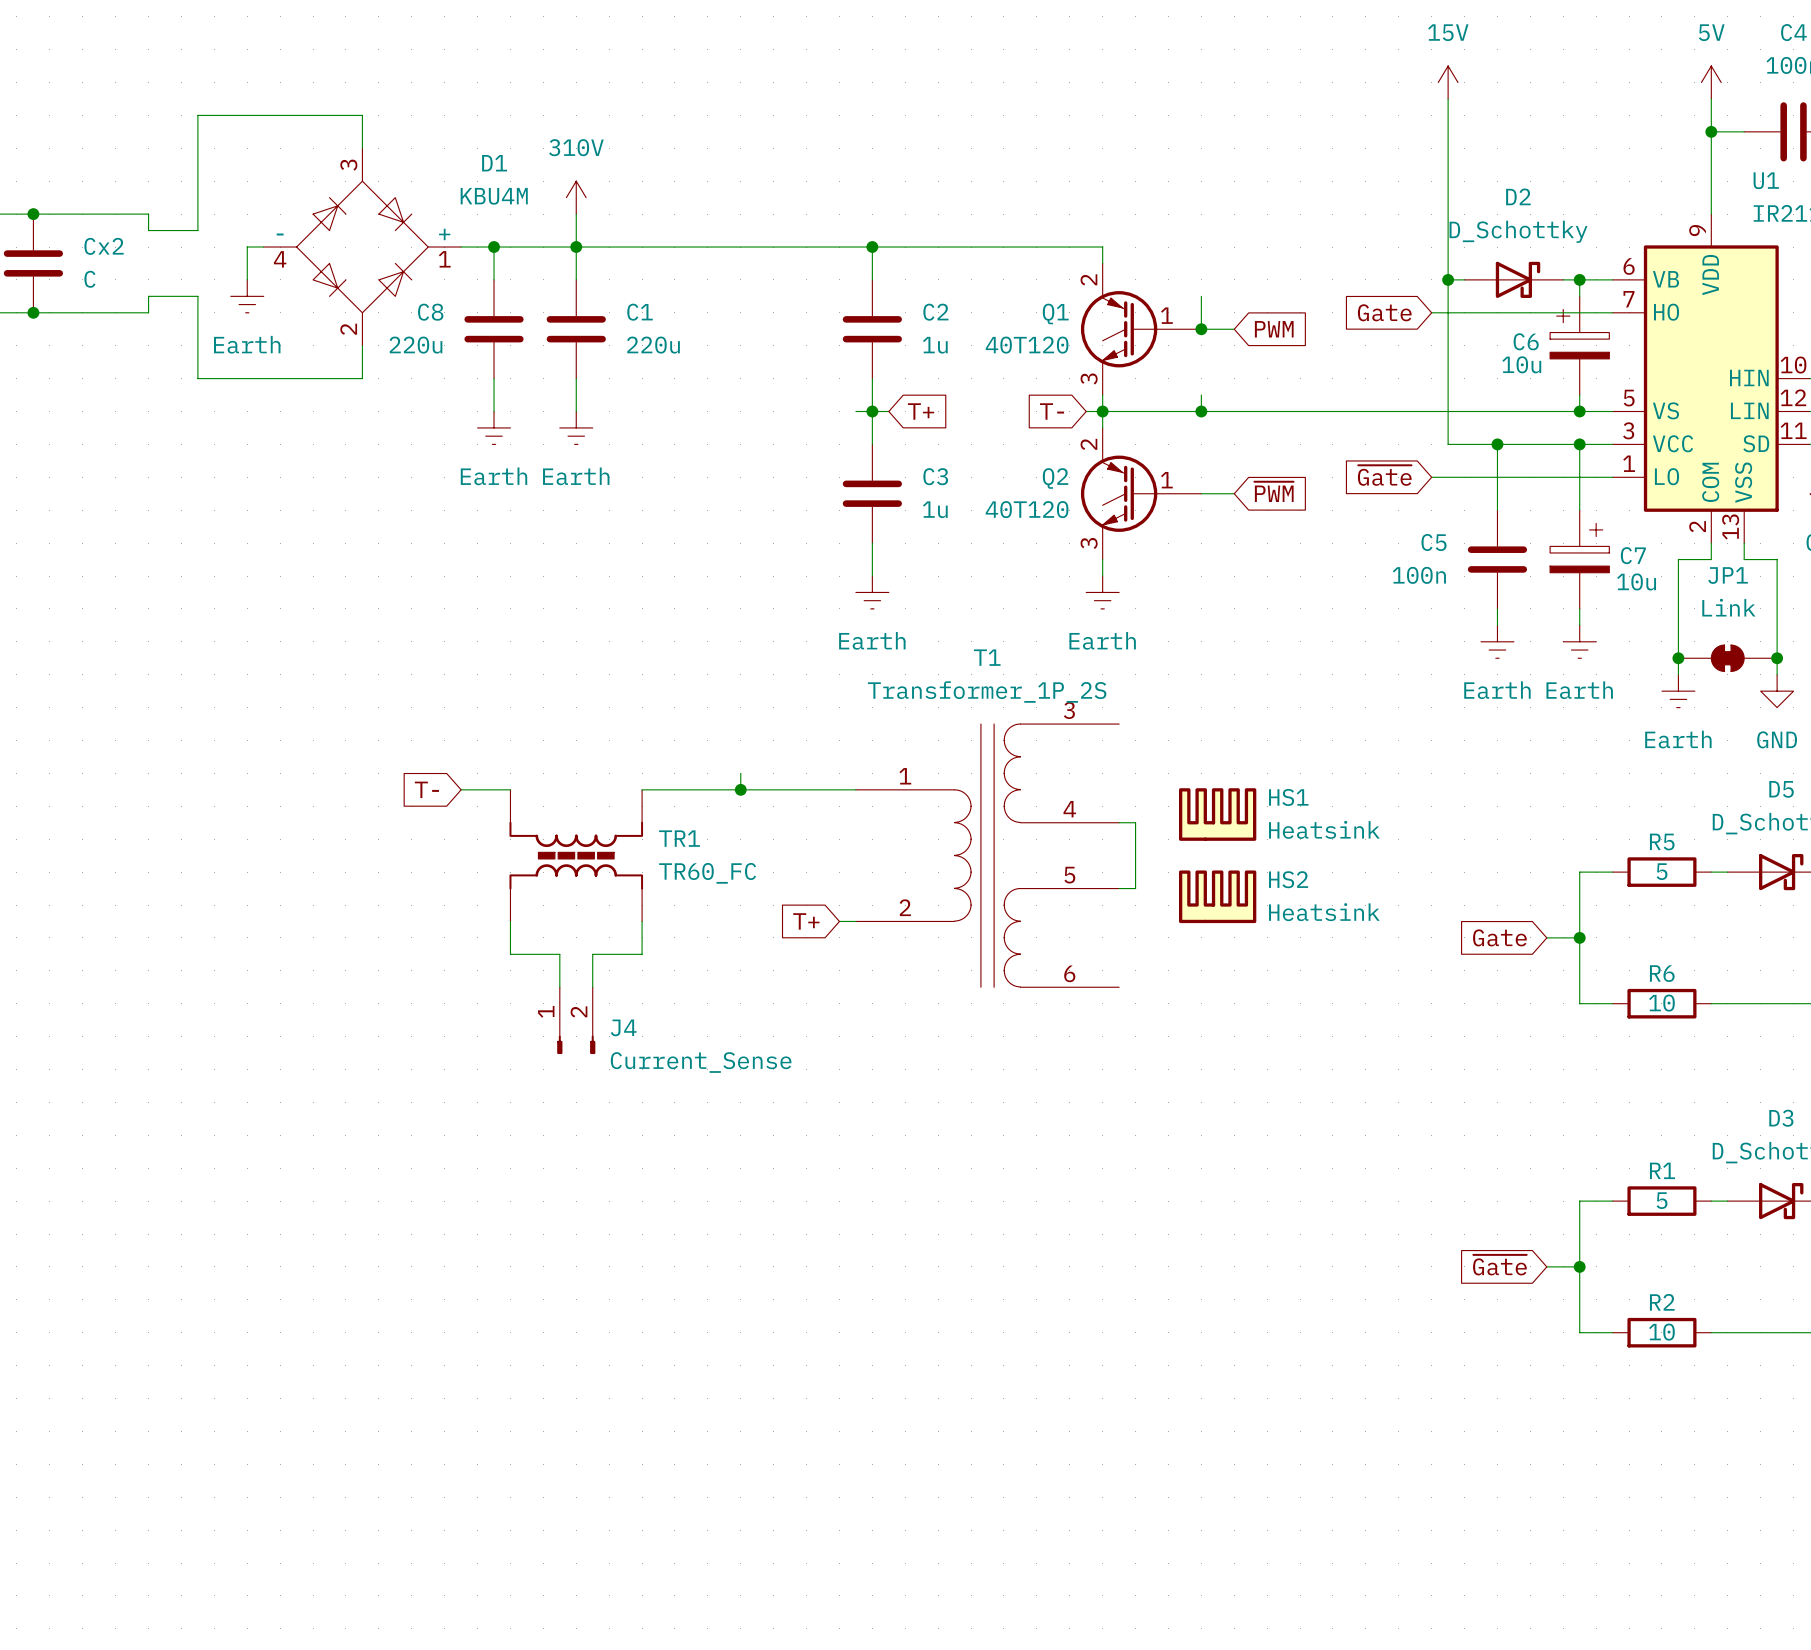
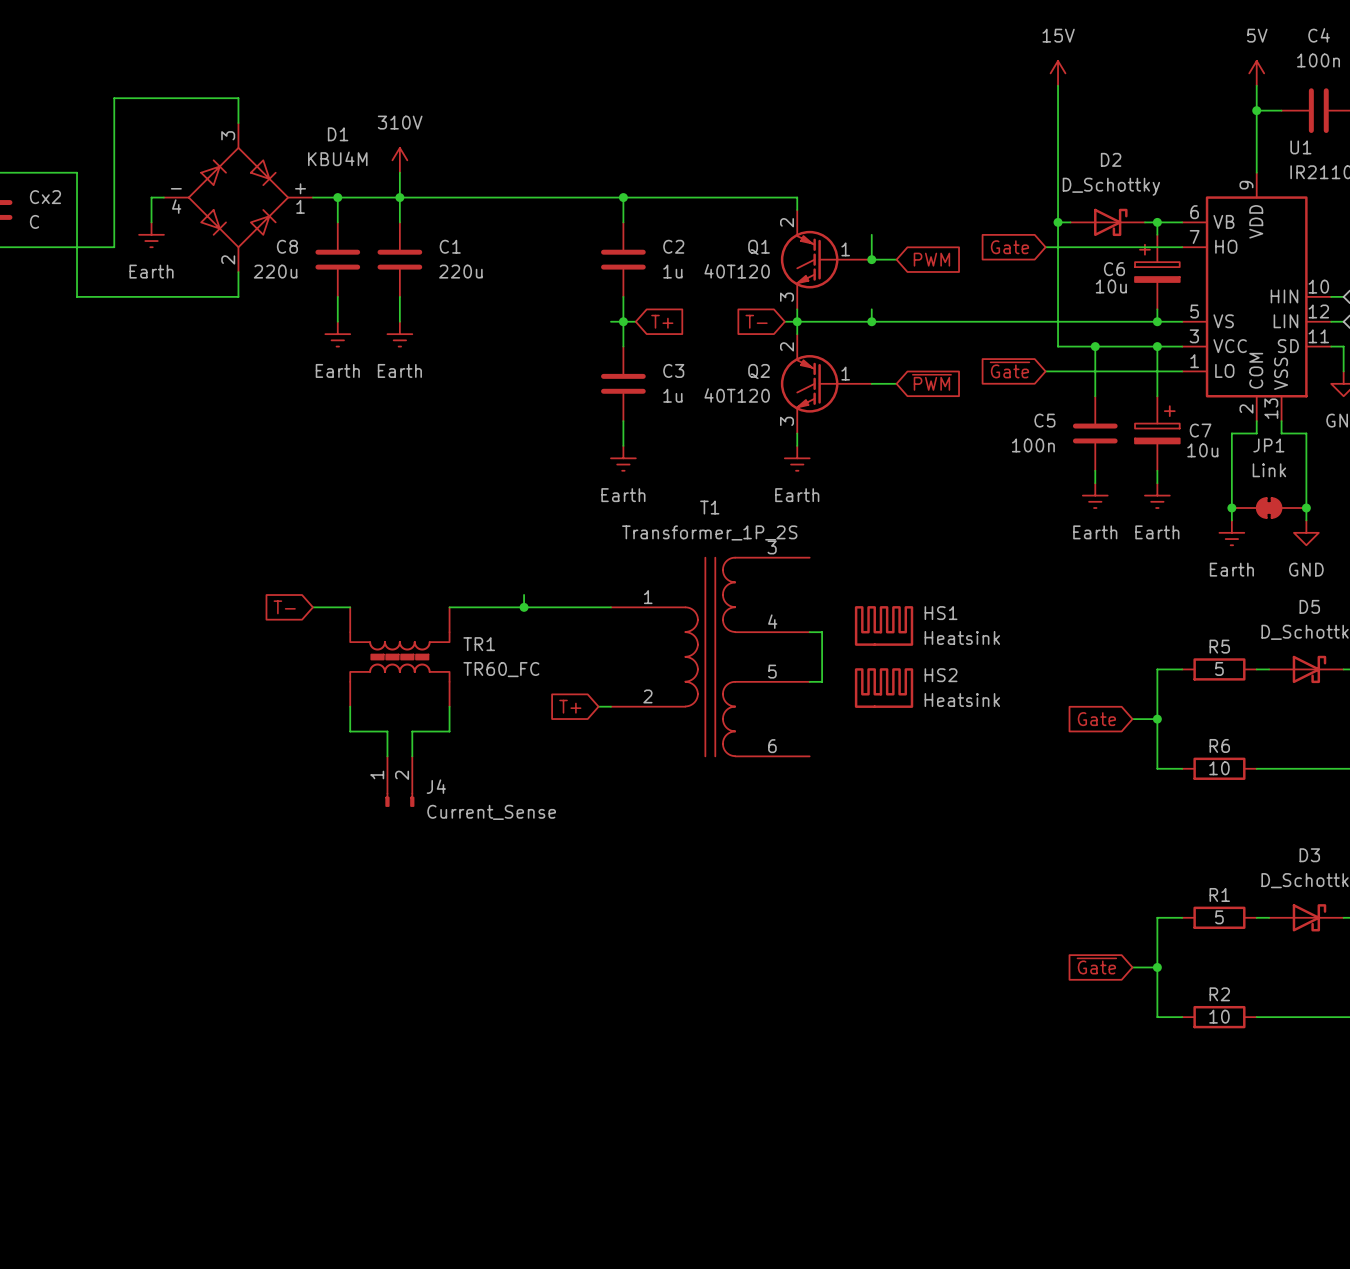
wire: (148, 230) (197, 230) -> (77, 185) (77, 234)
wire: (148, 296) (197, 296) -> (114, 185) (114, 234)
wire: (197, 312) (197, 378) -> (114, 247) (77, 247) (77, 296) (114, 296)

